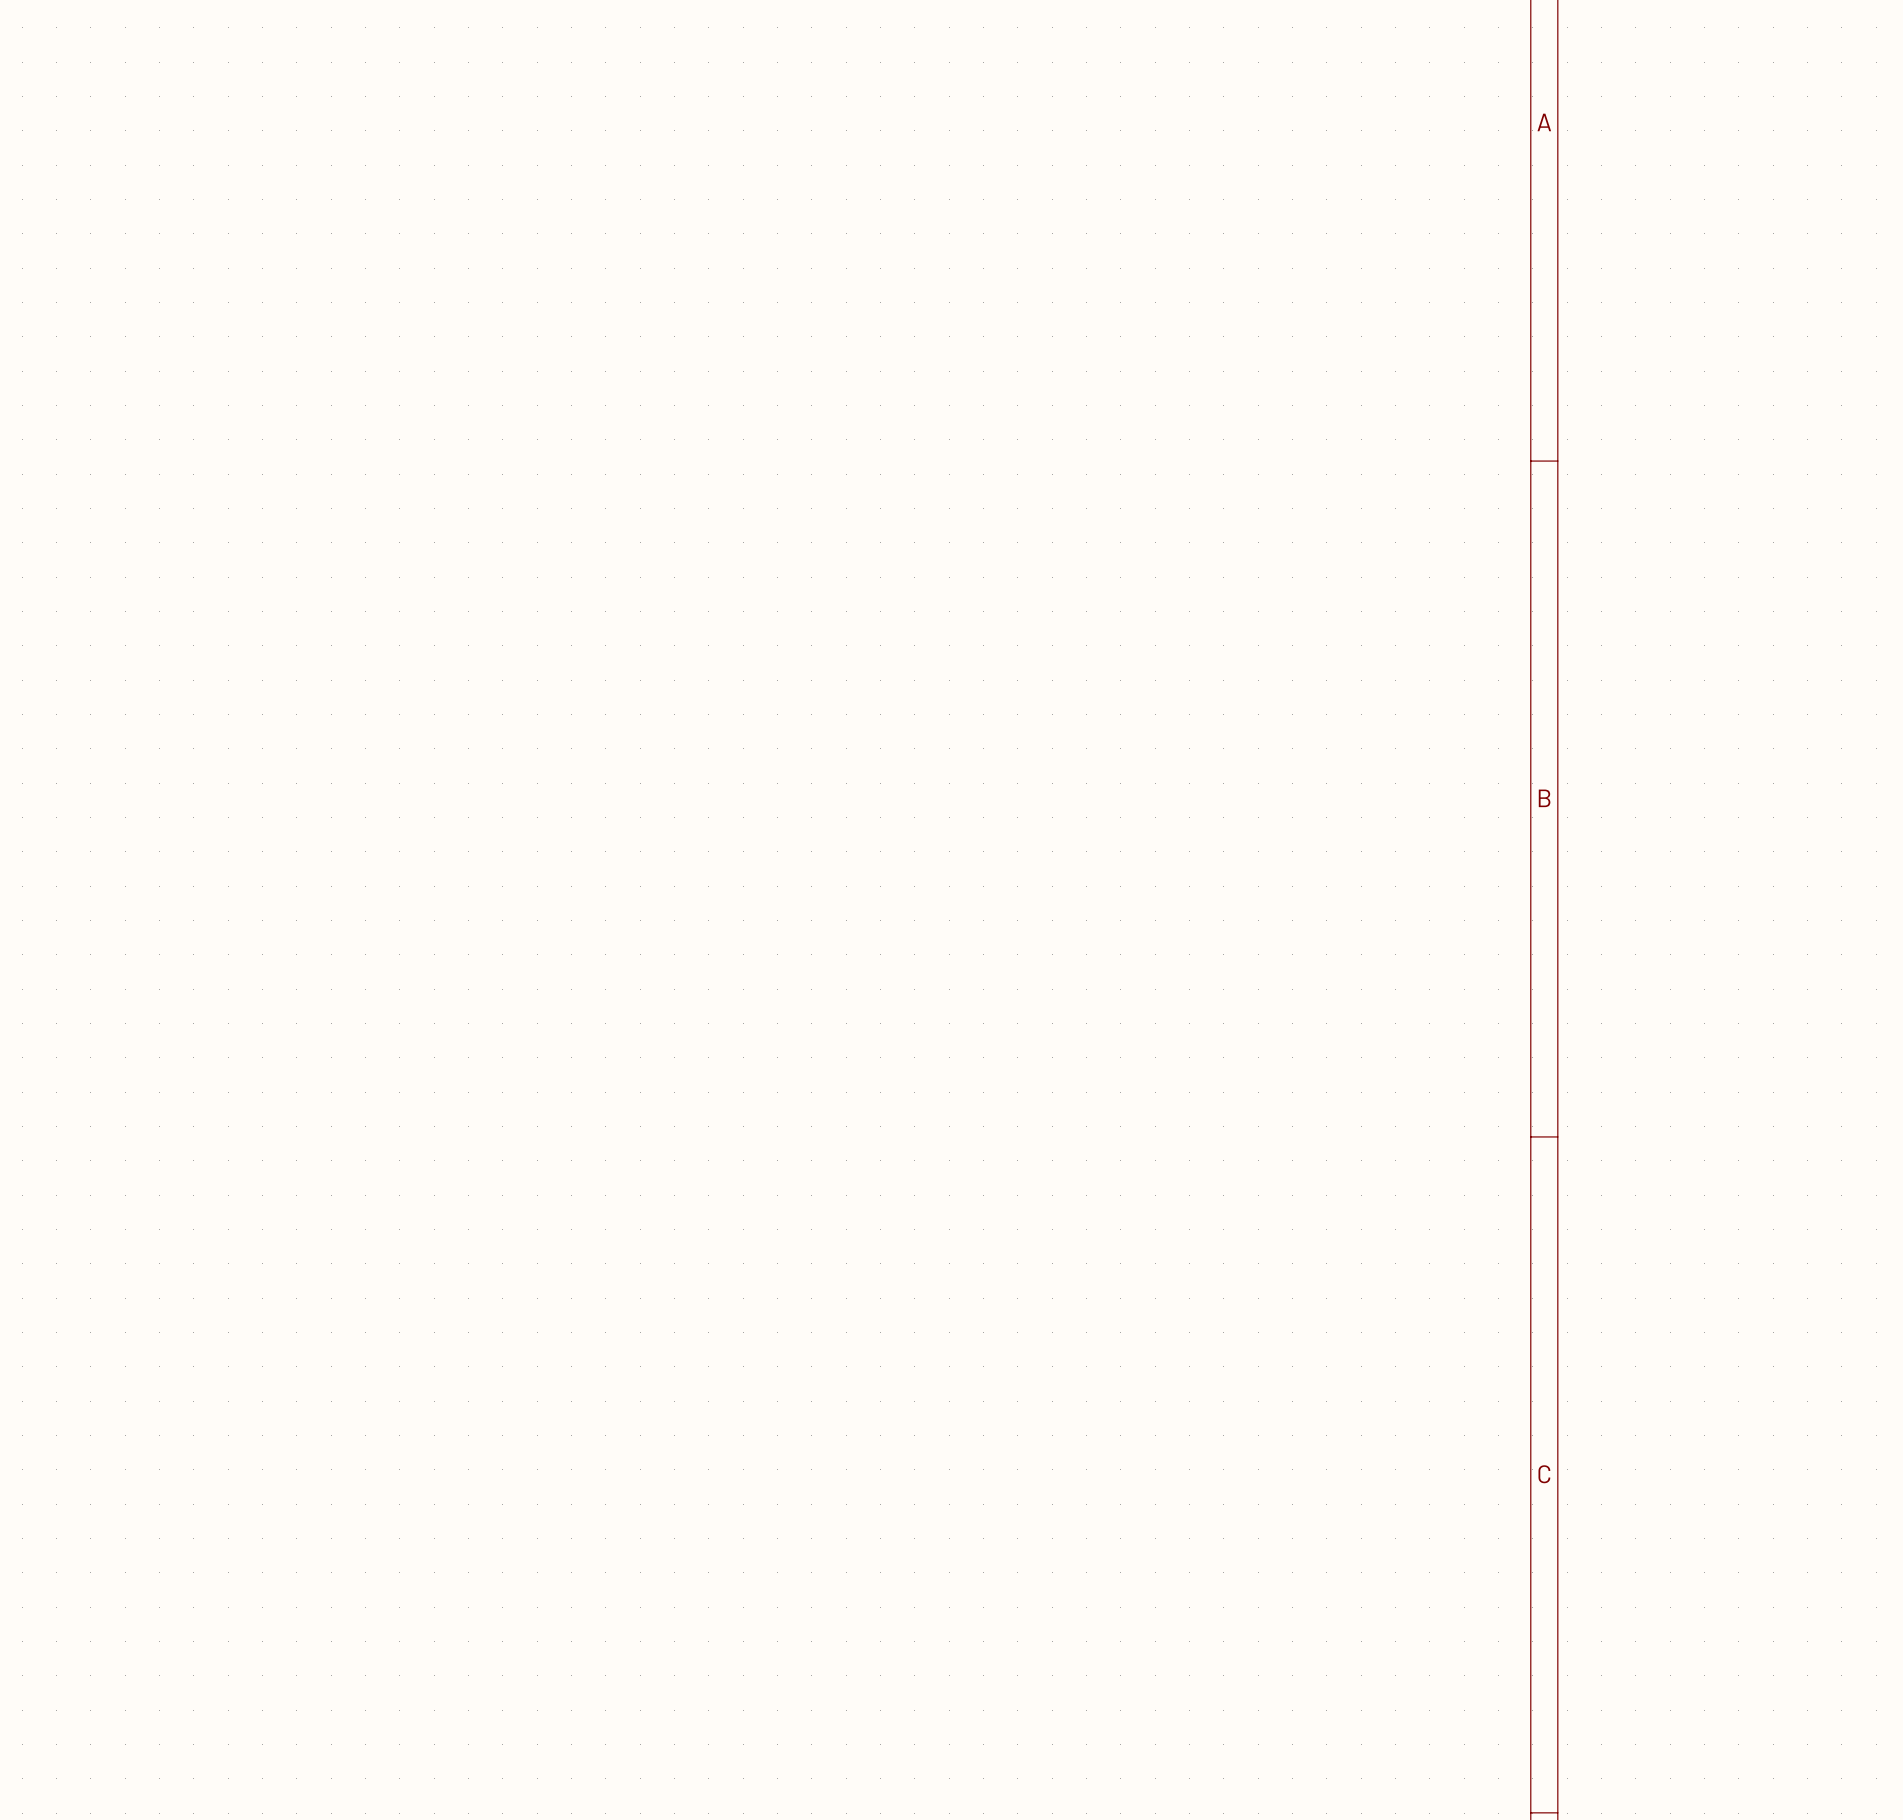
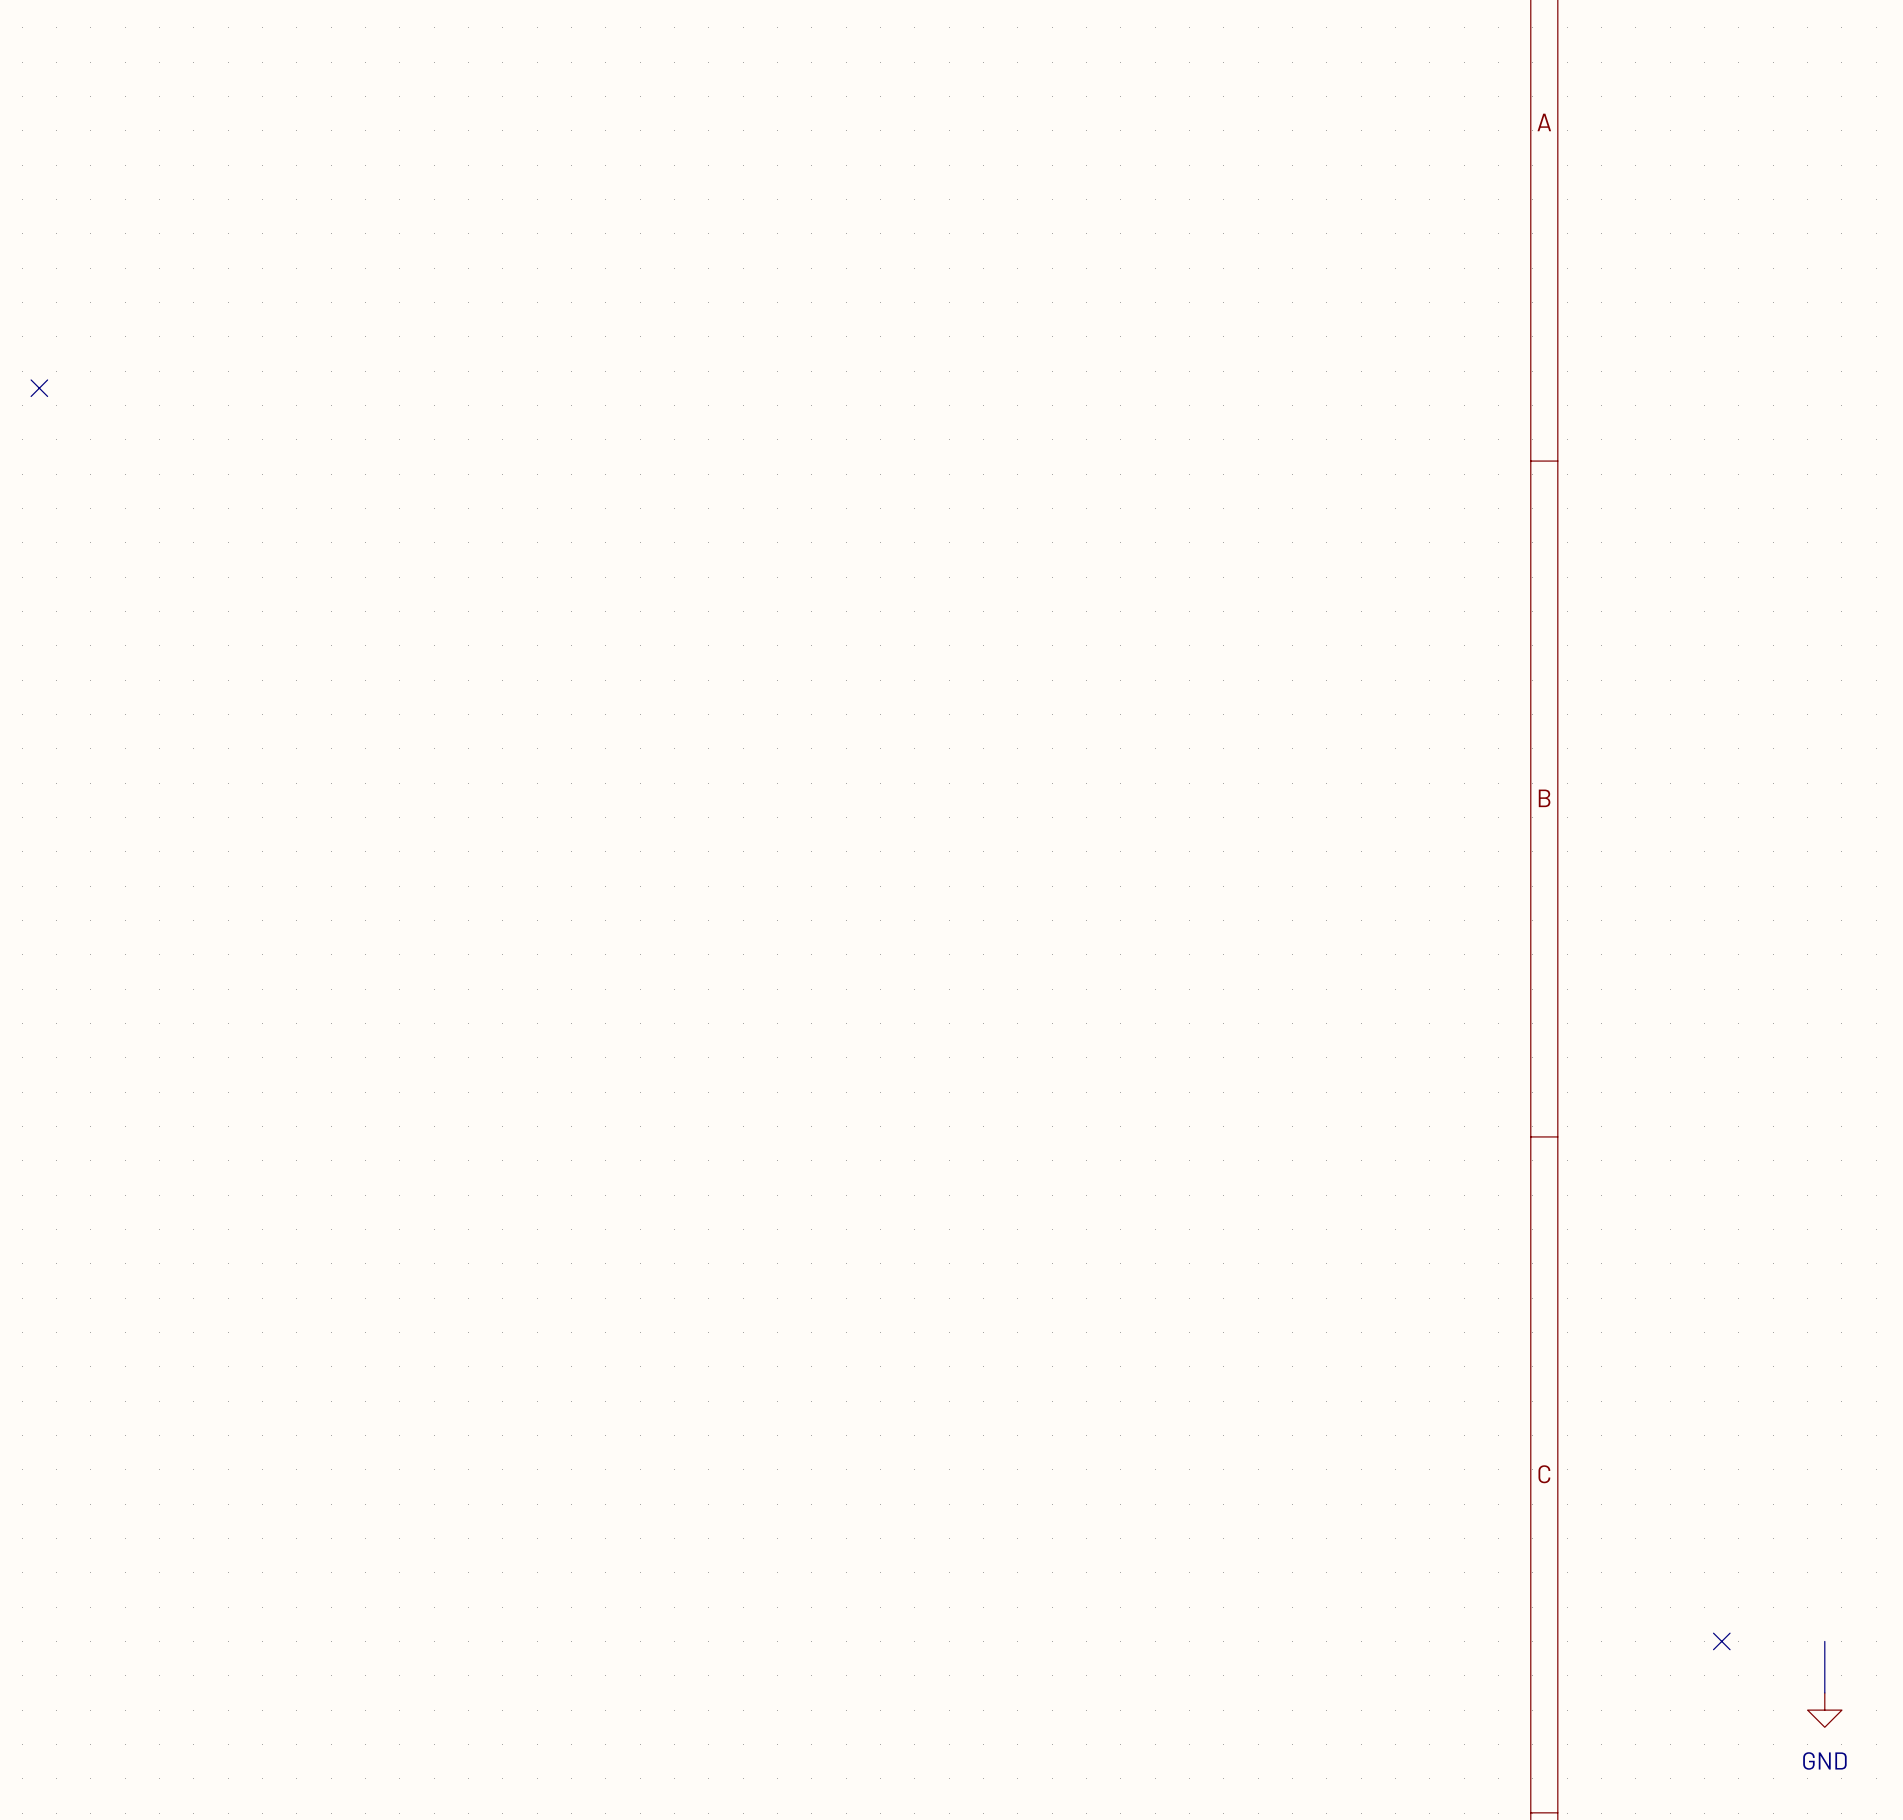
no-connect mark: none -> (39, 388)
no-connect mark: none -> (1721, 1641)
wire: none -> (1824, 1641) (1824, 1692)
power symbol: none -> GND (1824, 1710)

